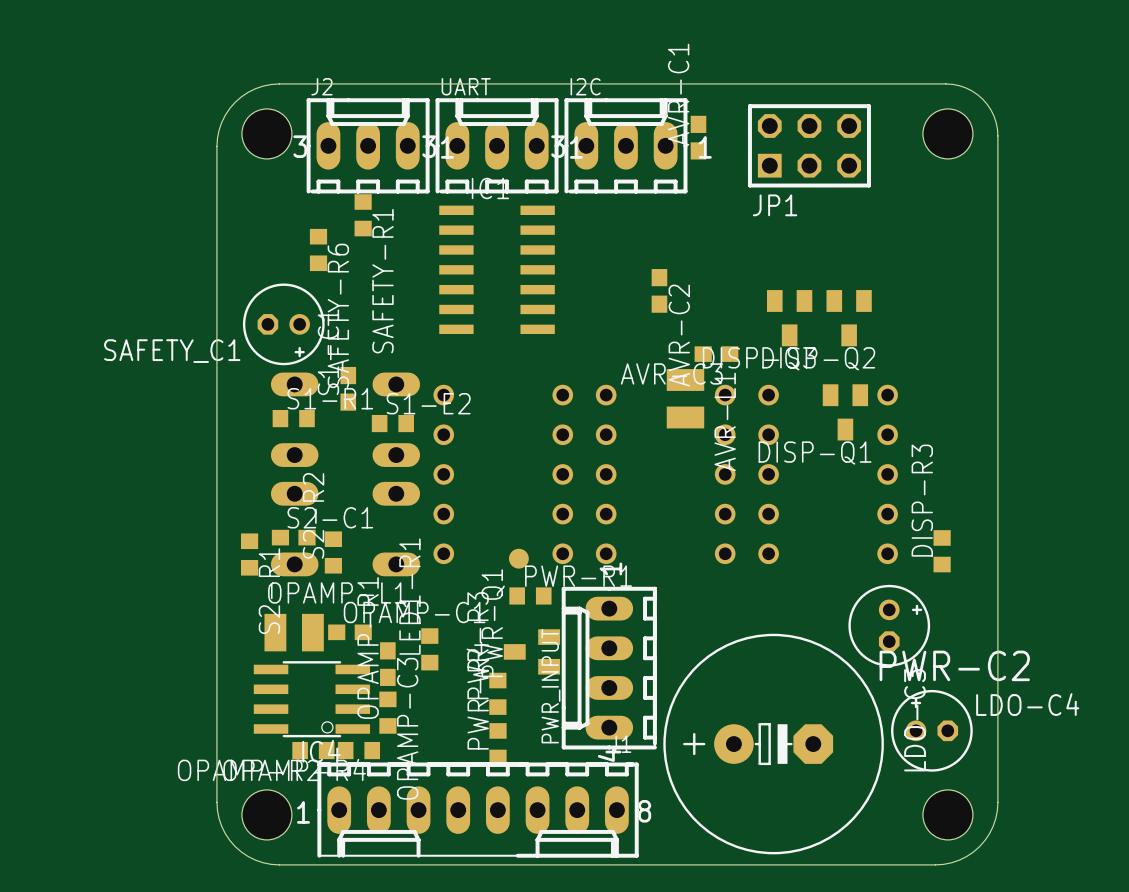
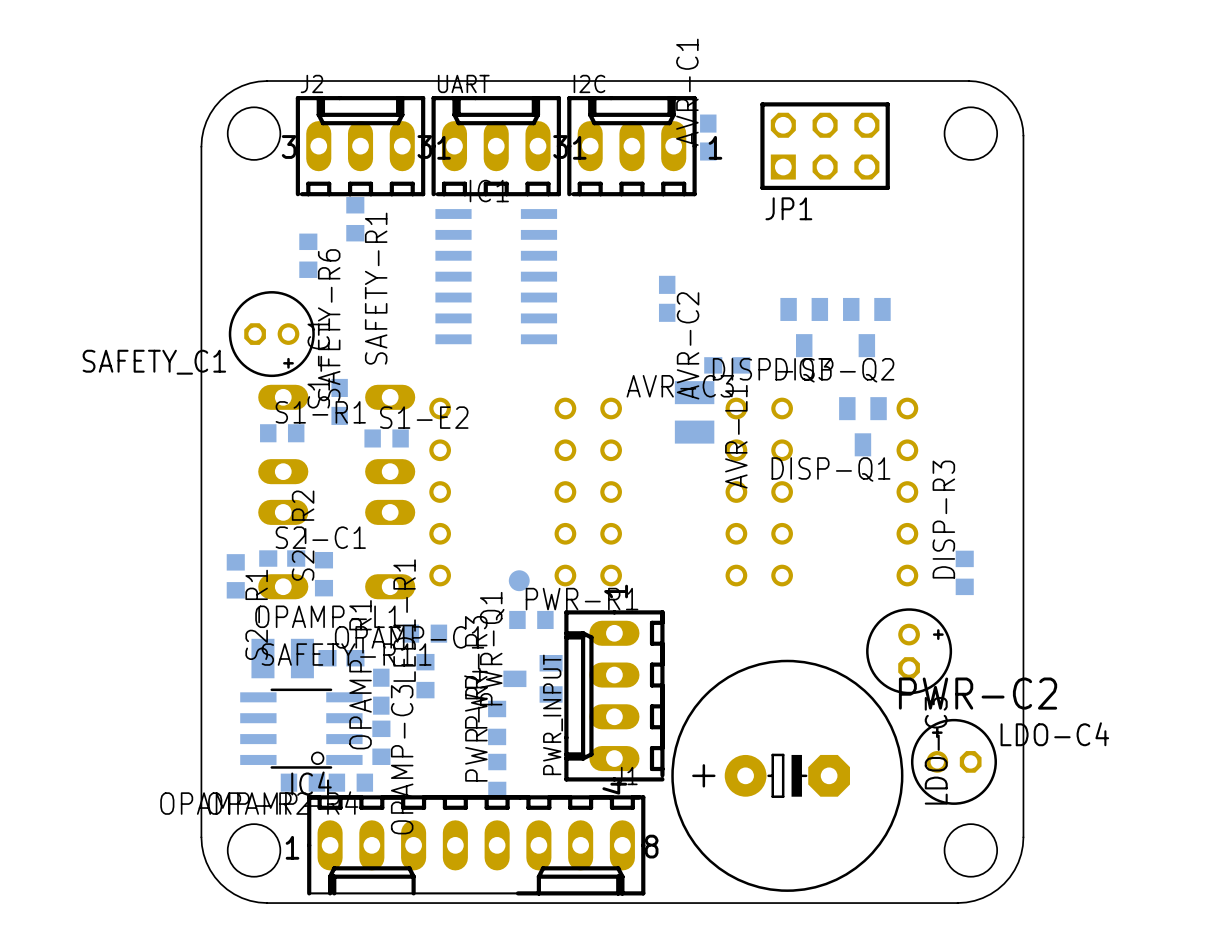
SAFETY-R11: none -> (424, 633)

